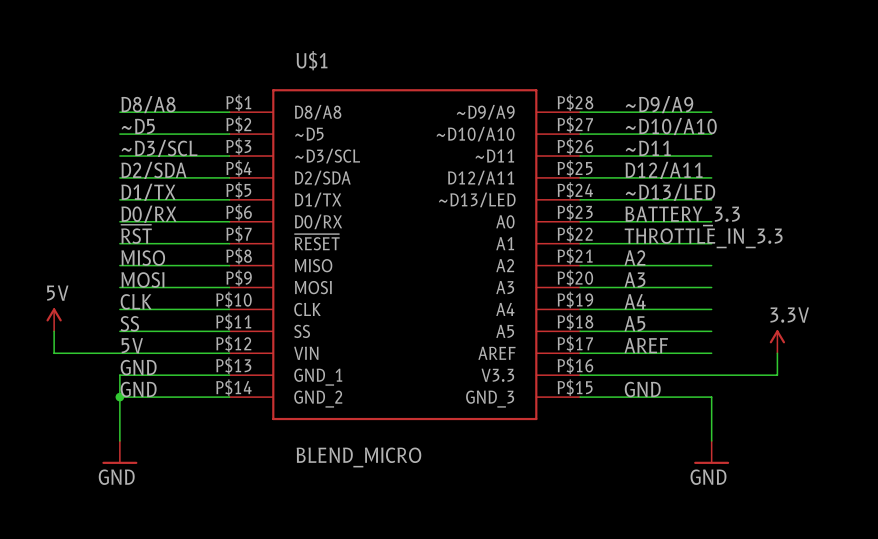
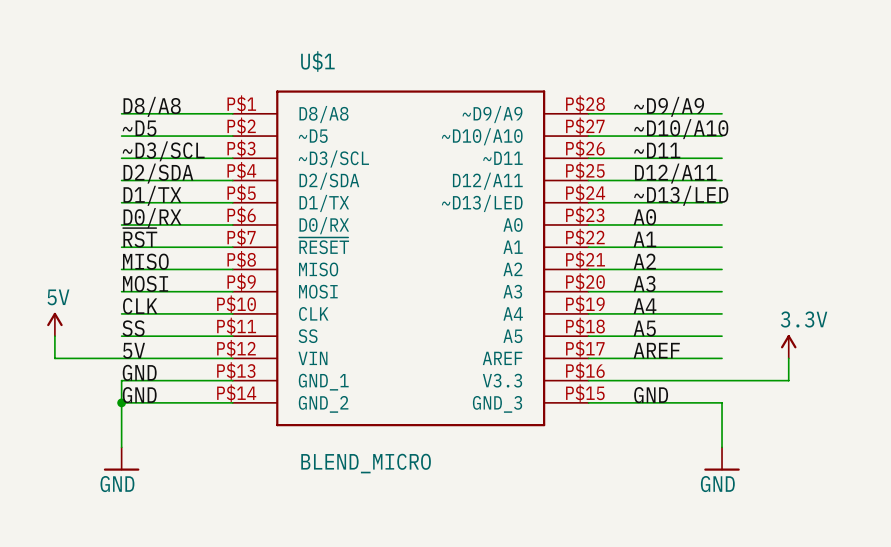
label: BATTERY_3.3 (682, 216) -> A0 (644, 217)
label: THROTTLE_IN_3.3 (703, 238) -> A1 (644, 239)

